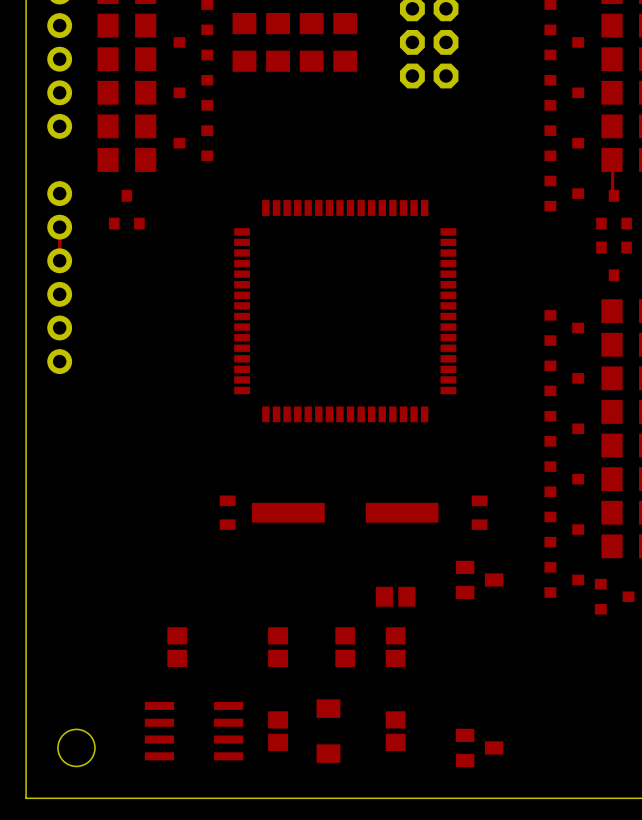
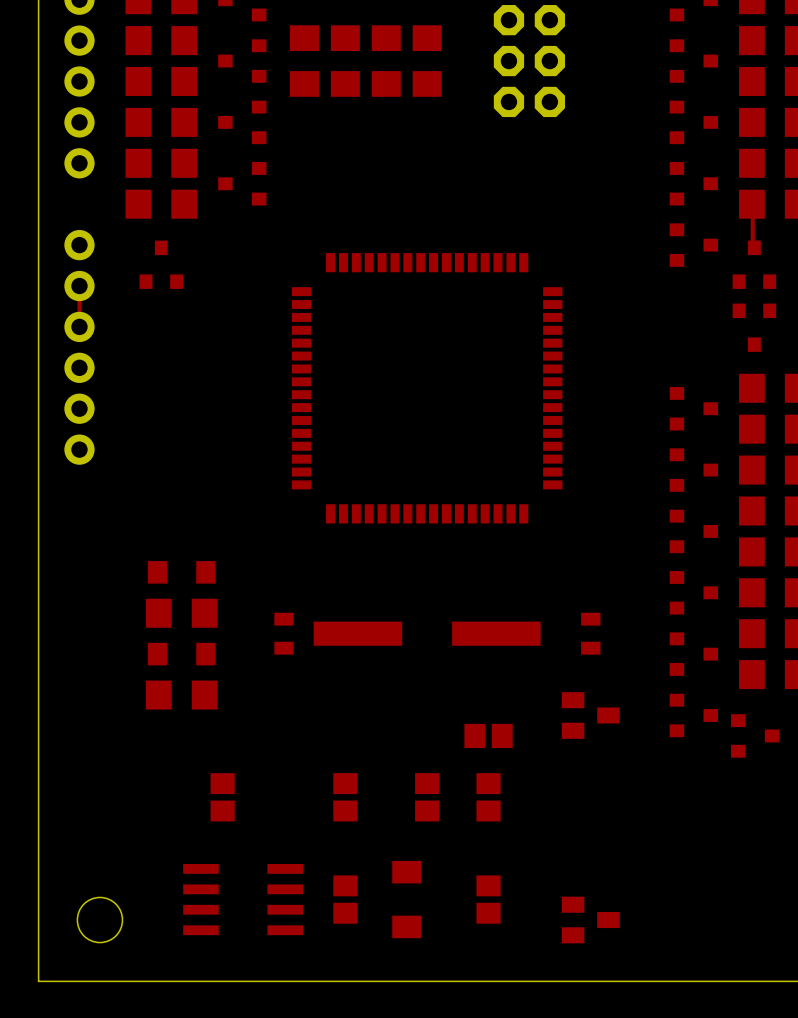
part: none -> (181, 572)
part: none -> (181, 613)
part: none -> (181, 654)
part: none -> (181, 695)

